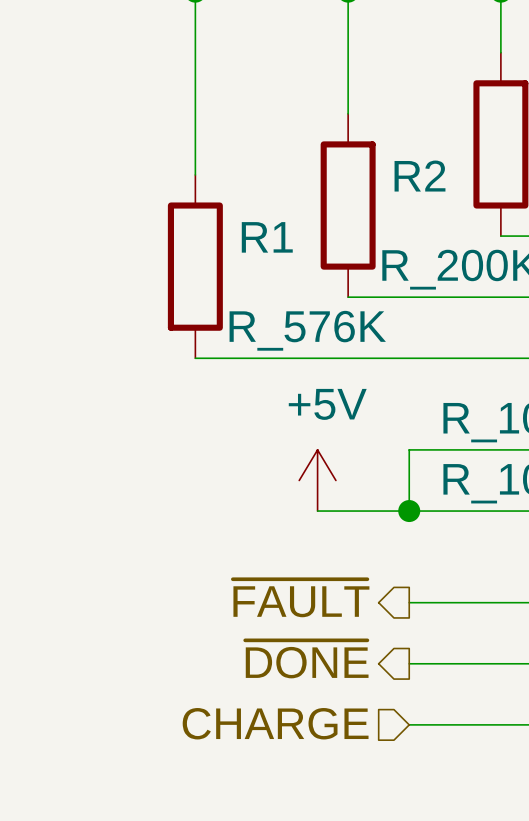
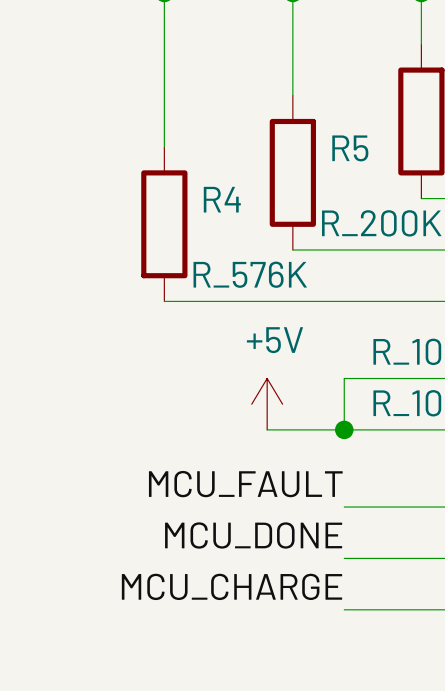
R2 name: R2 (419, 176) -> R5 (350, 148)
R1 name: R1 (267, 237) -> R4 (222, 199)
label: none -> MCU_FAULT (245, 484)
hierarchical label: ~{FAULT} (301, 598) -> none
label: none -> MCU_DONE (253, 535)
hierarchical label: ~{DONE} (306, 659) -> none
label: none -> MCU_CHARGE (231, 586)
hierarchical label: CHARGE (275, 723) -> none

